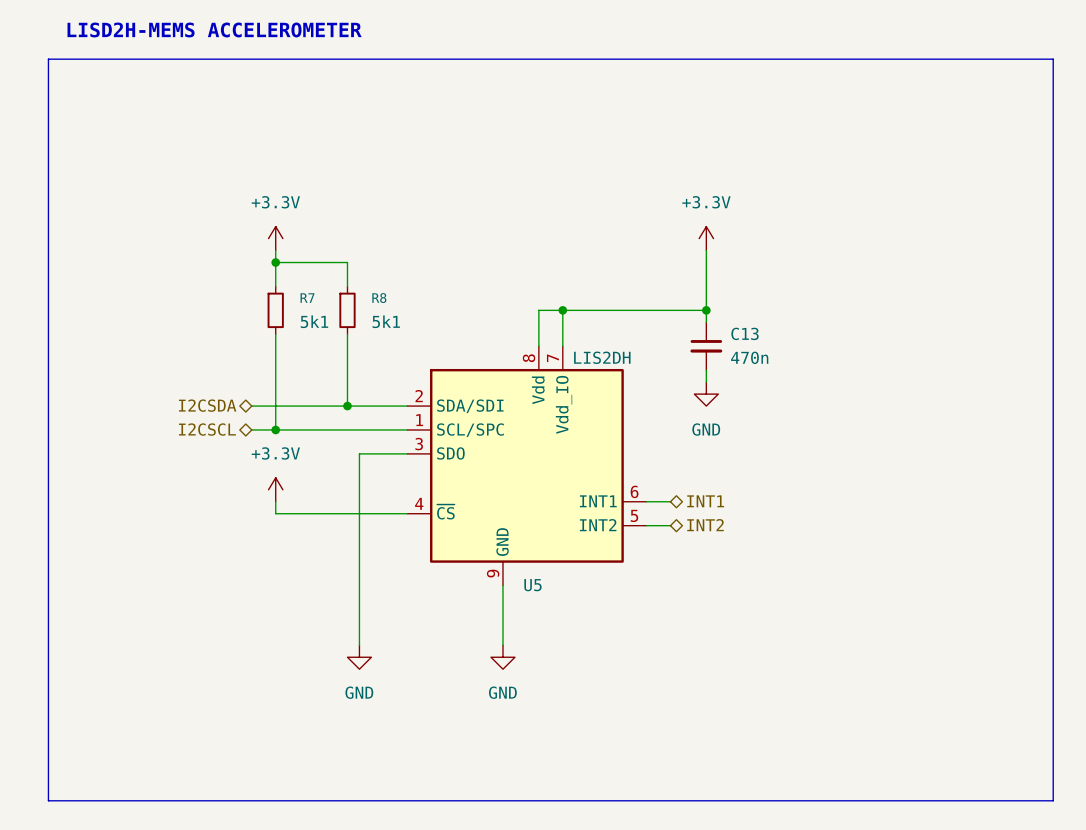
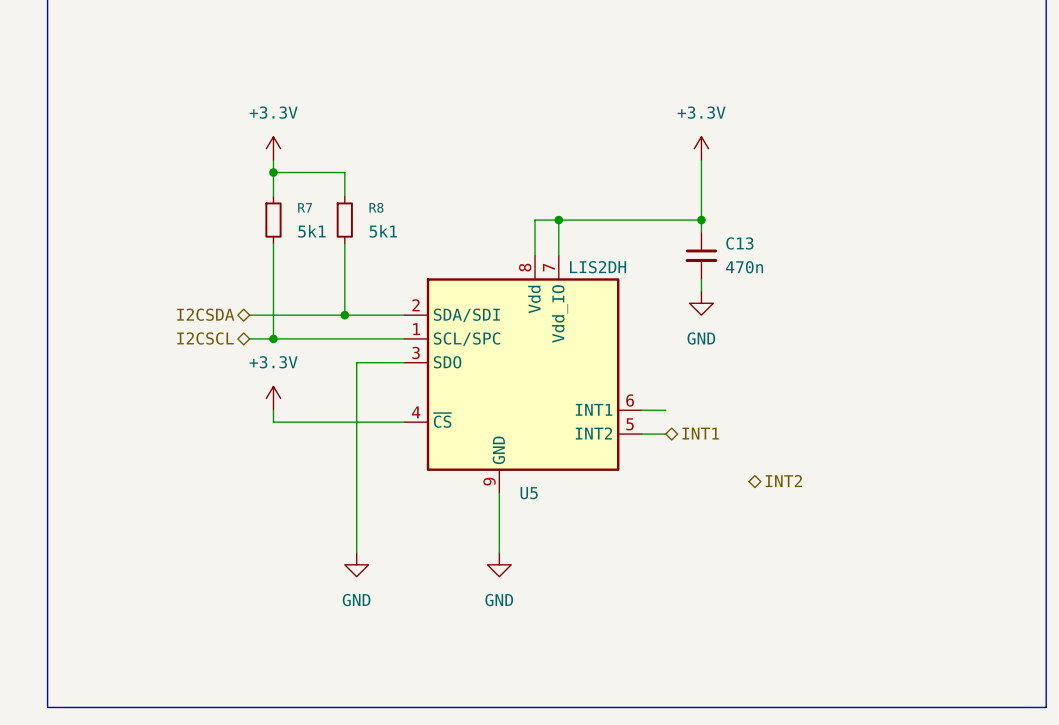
hierarchical label: INT1 (705, 501) -> none
hierarchical label: INT2 (705, 525) -> INT1 (700, 433)
hierarchical label: none -> INT2 (783, 481)

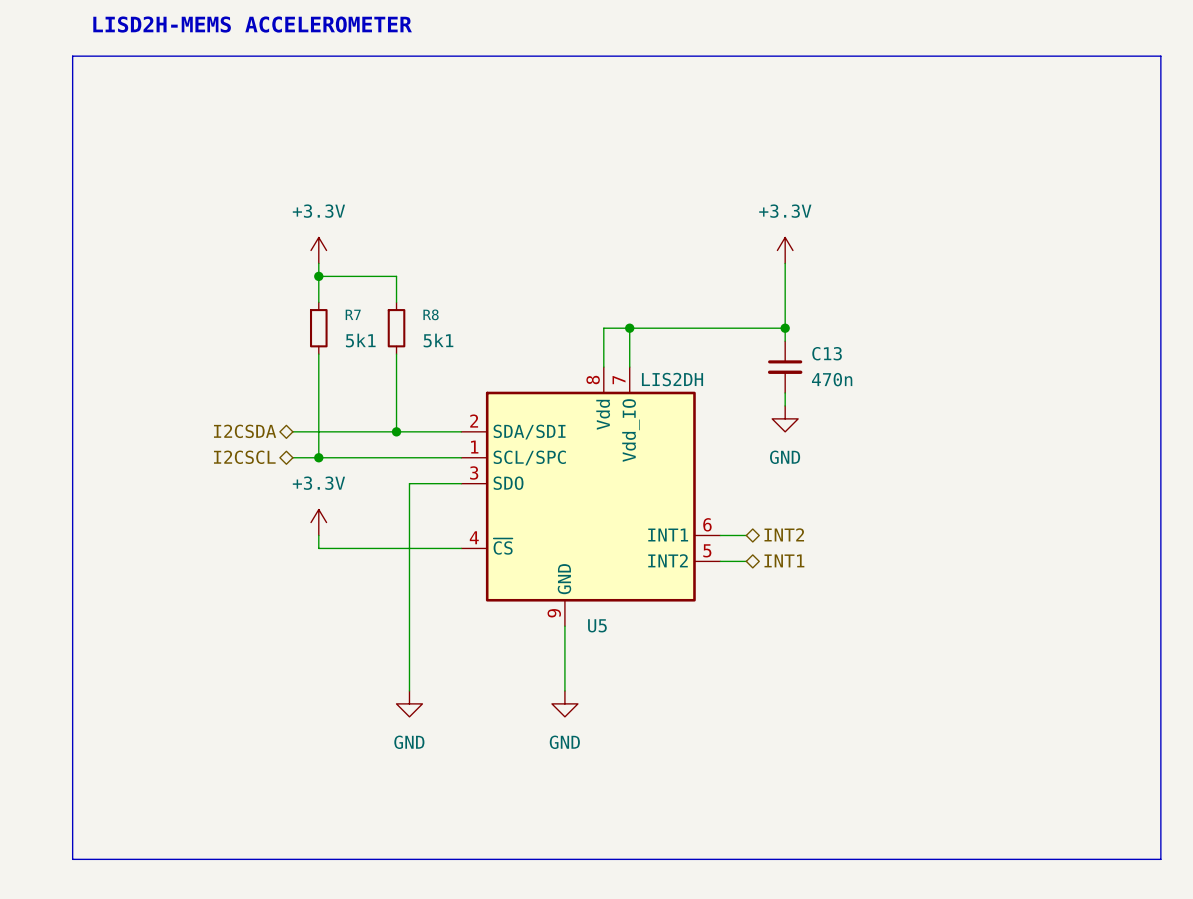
hierarchical label position: INT2 (783, 481) -> INT2 (784, 534)

